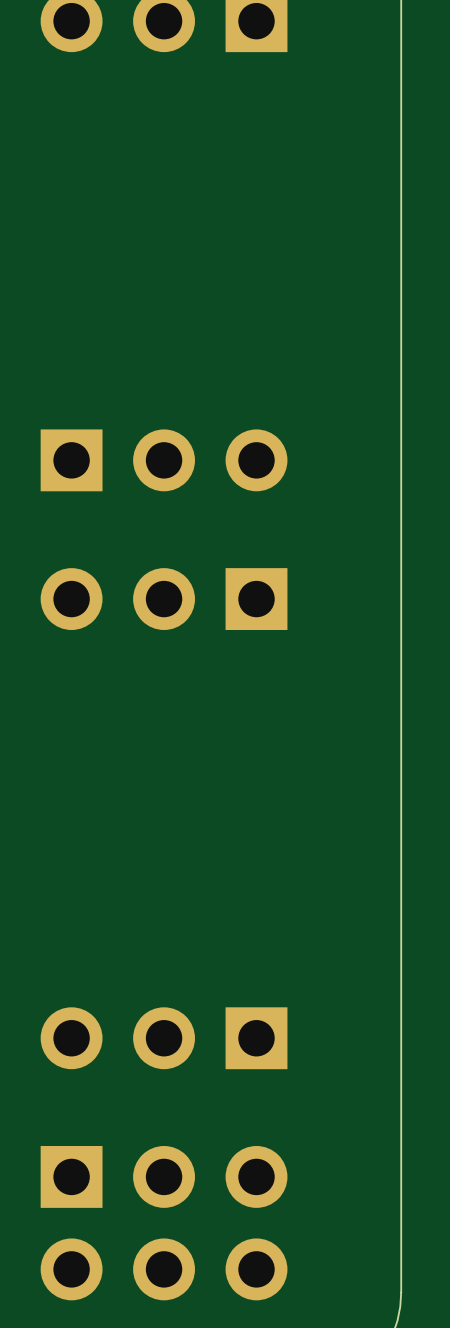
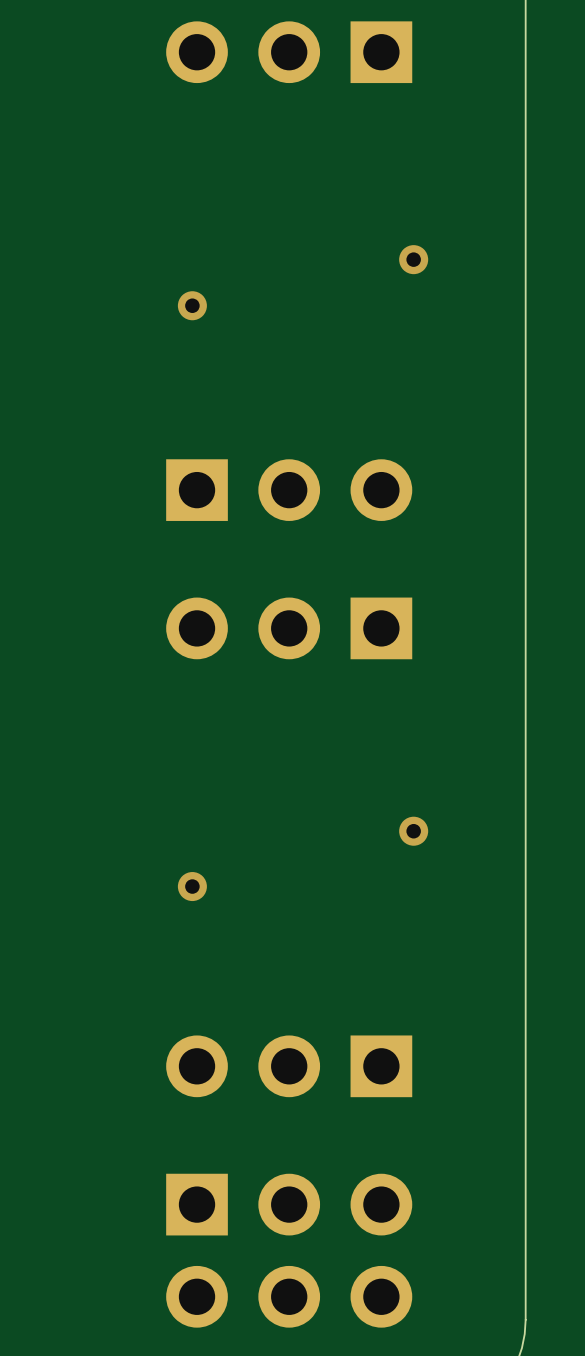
via: none -> (413, 259)
via: none -> (192, 305)
via: none -> (413, 831)
via: none -> (192, 886)

